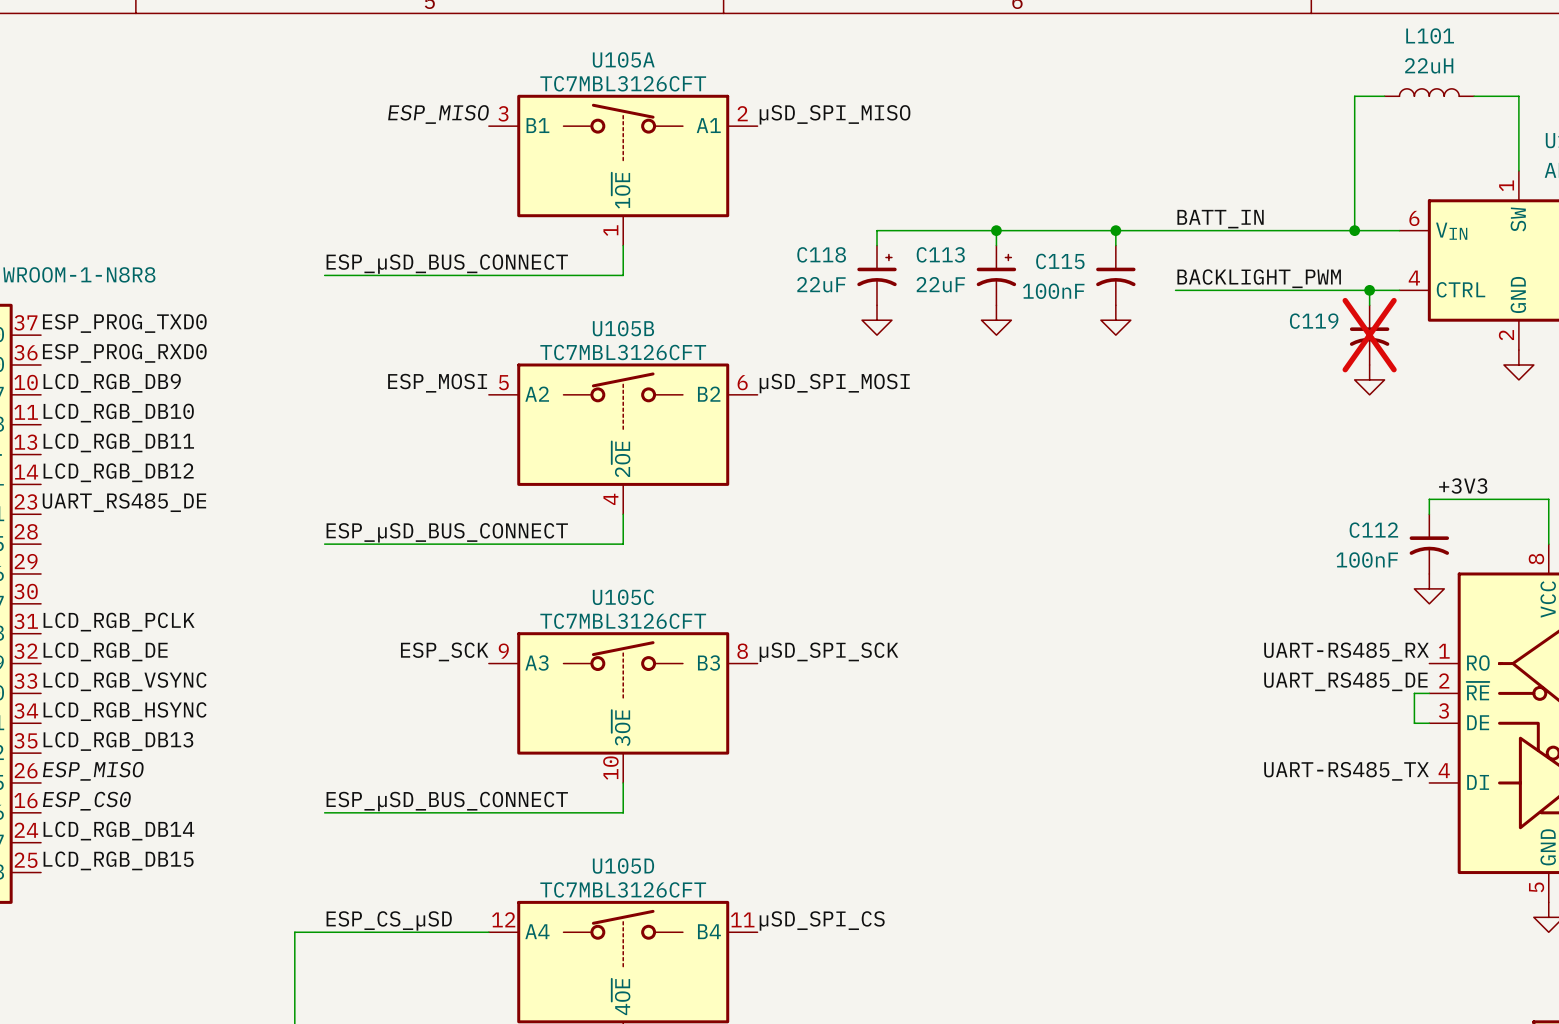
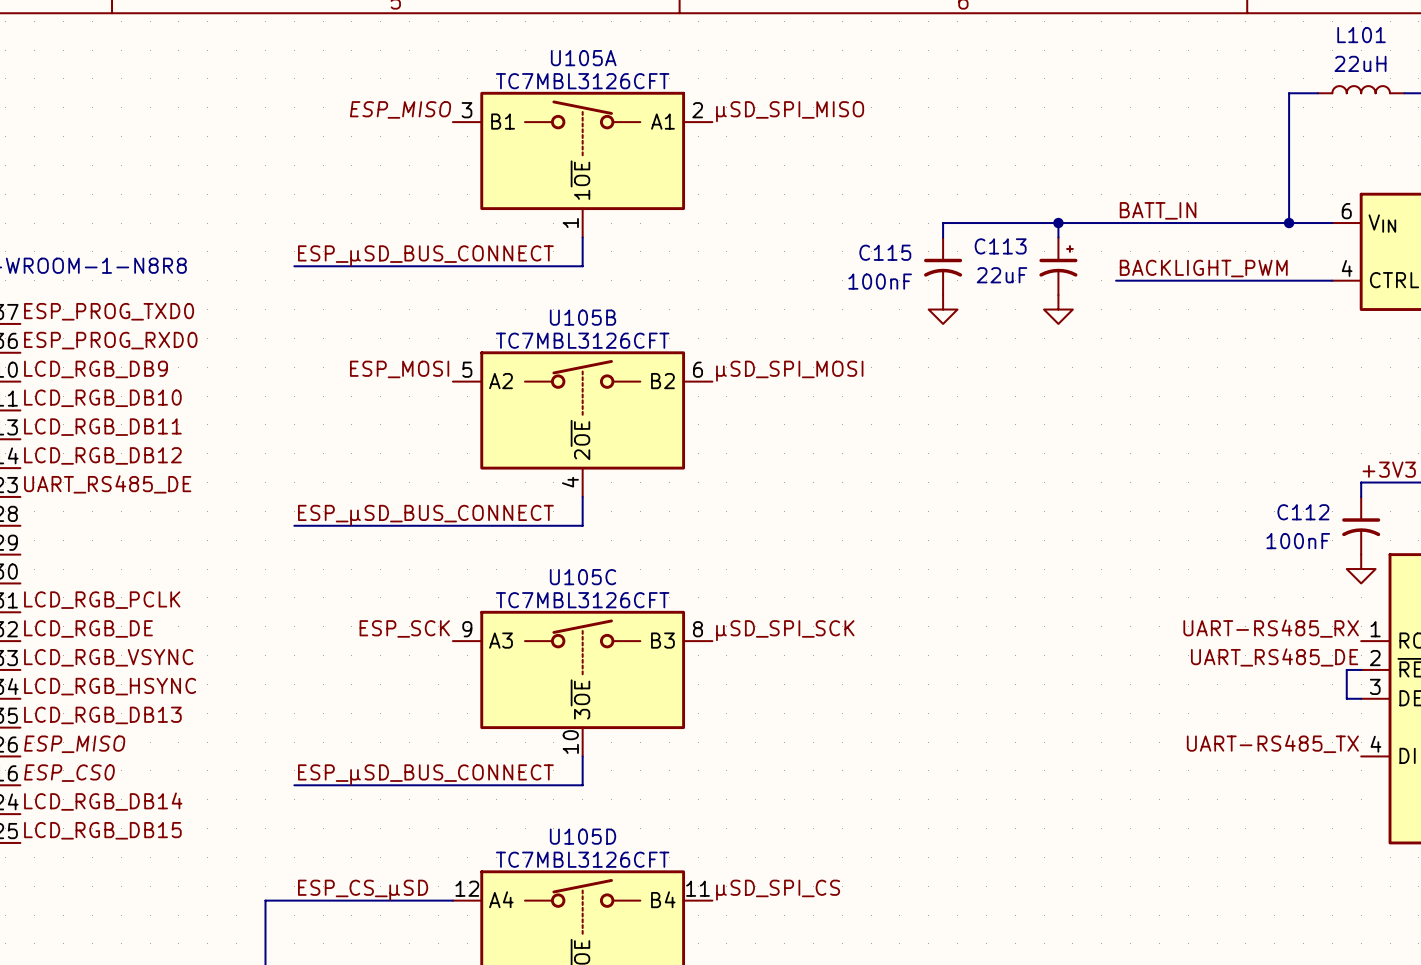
wire: (996, 230) (876, 230) (876, 245) -> none
junction: (996, 230) -> none
C118: 22uF (876, 275) -> none
C113 position: (996, 275) -> (1058, 266)
C115 position: (1115, 275) -> (943, 266)
wire: (1369, 290) (1369, 305) -> none
junction: (1369, 290) -> none
power symbol: (876, 320) -> none
C119: (1369, 335) -> none
power symbol: (1369, 379) -> none

